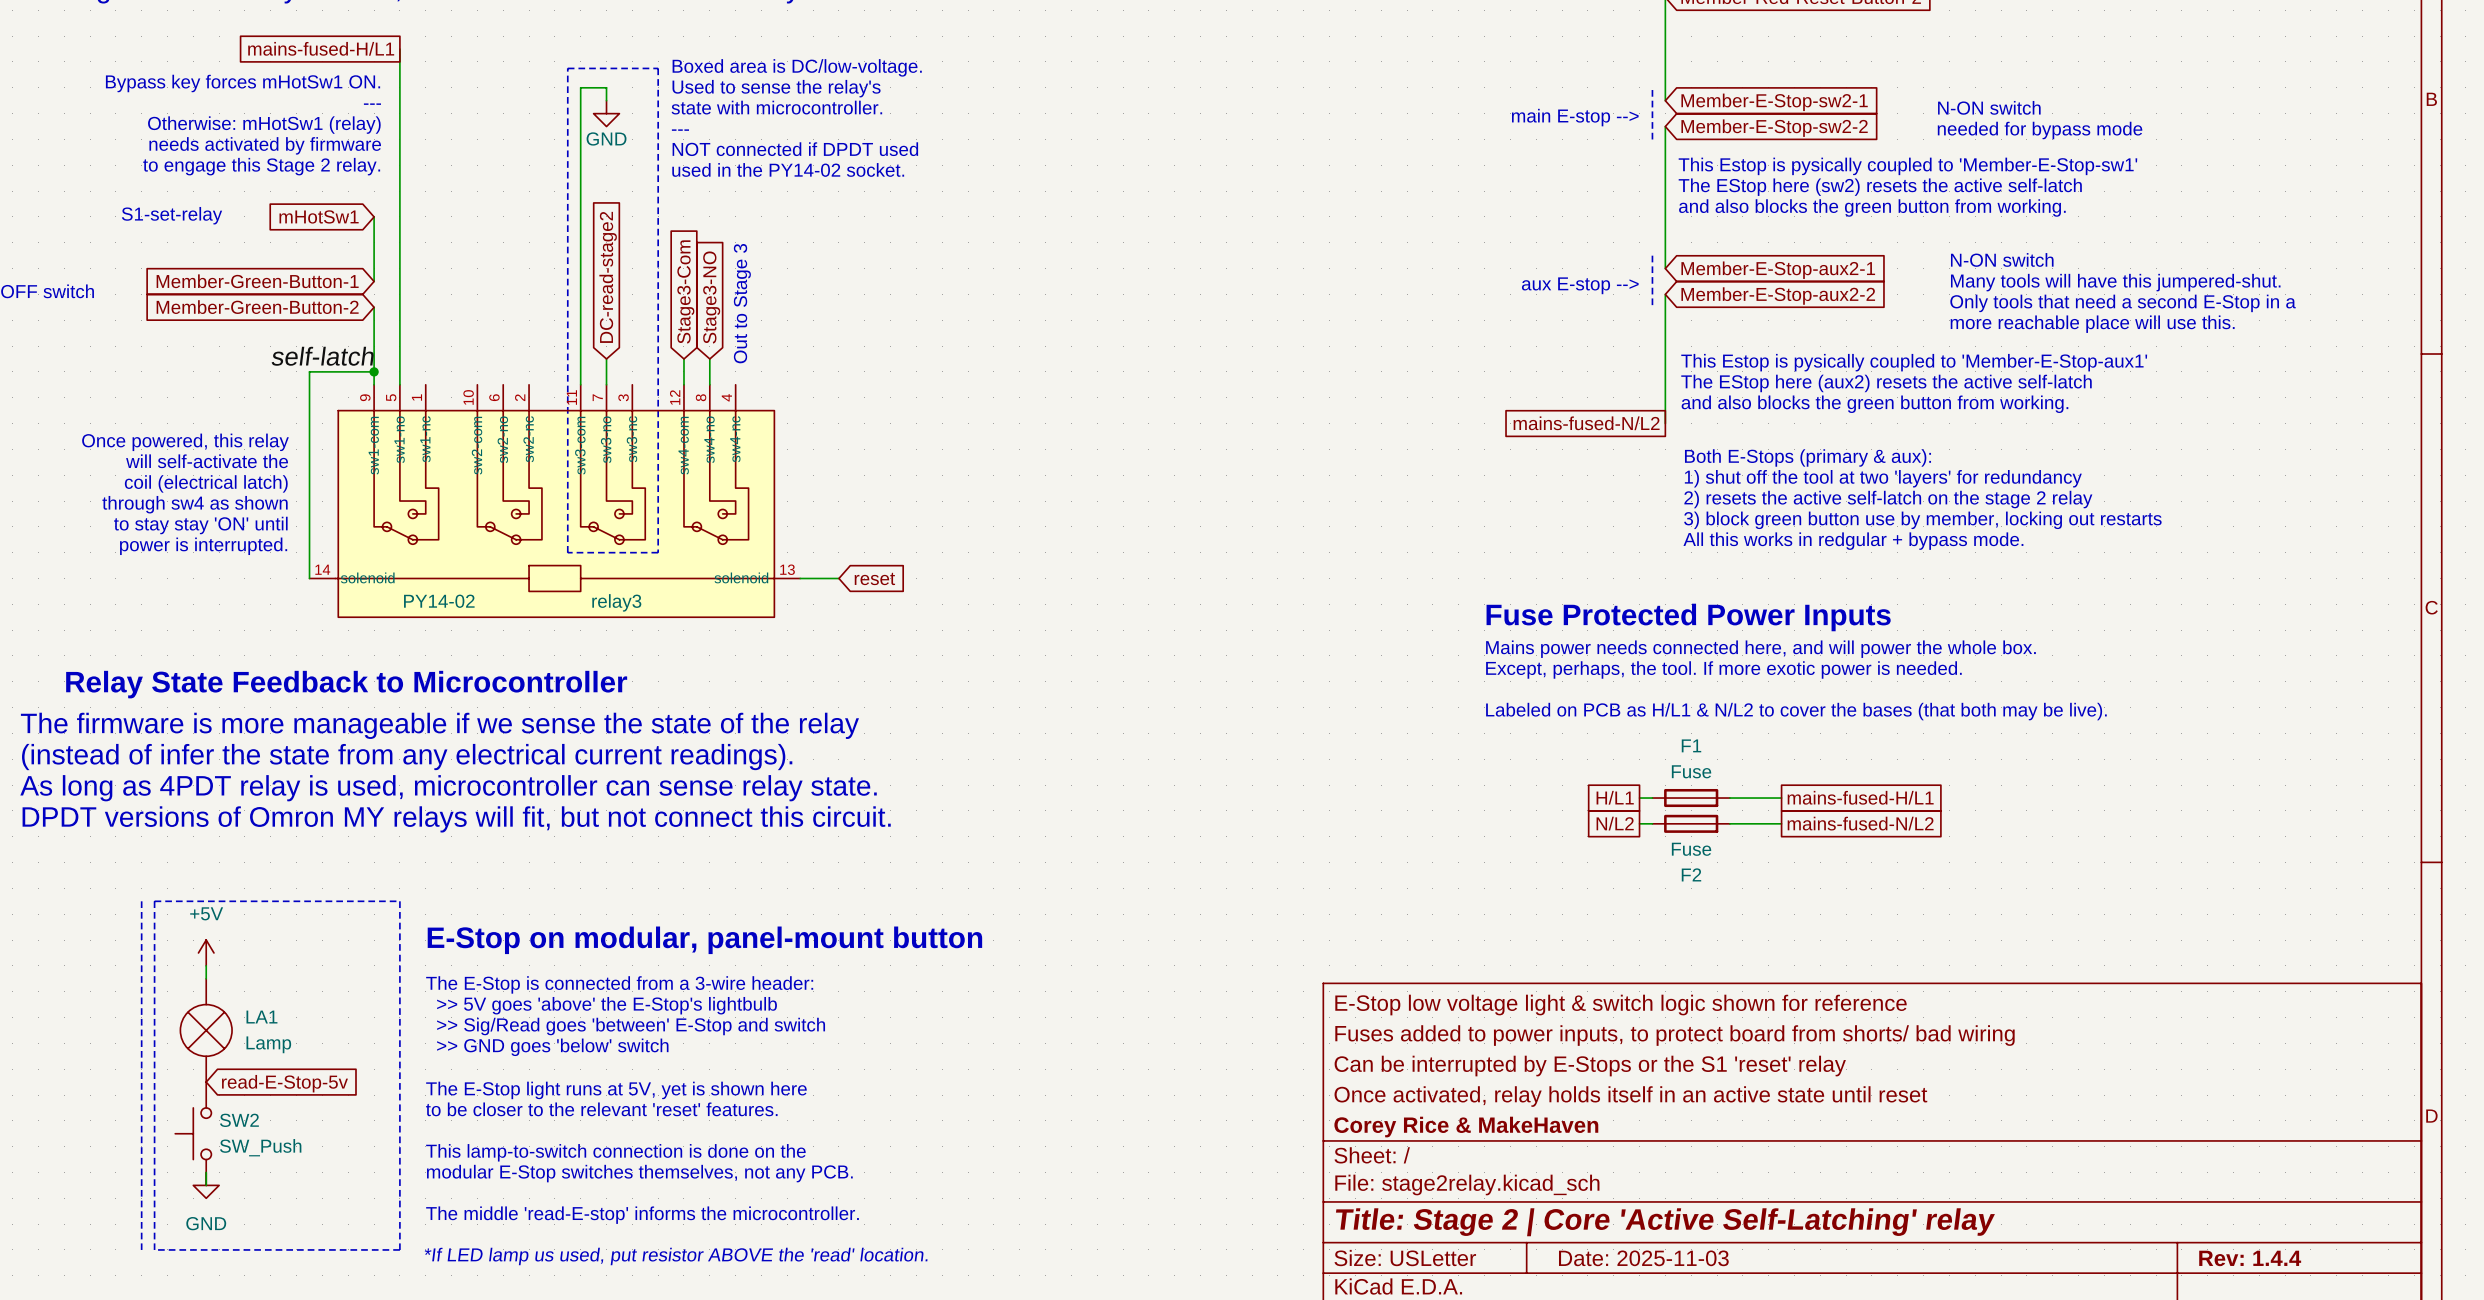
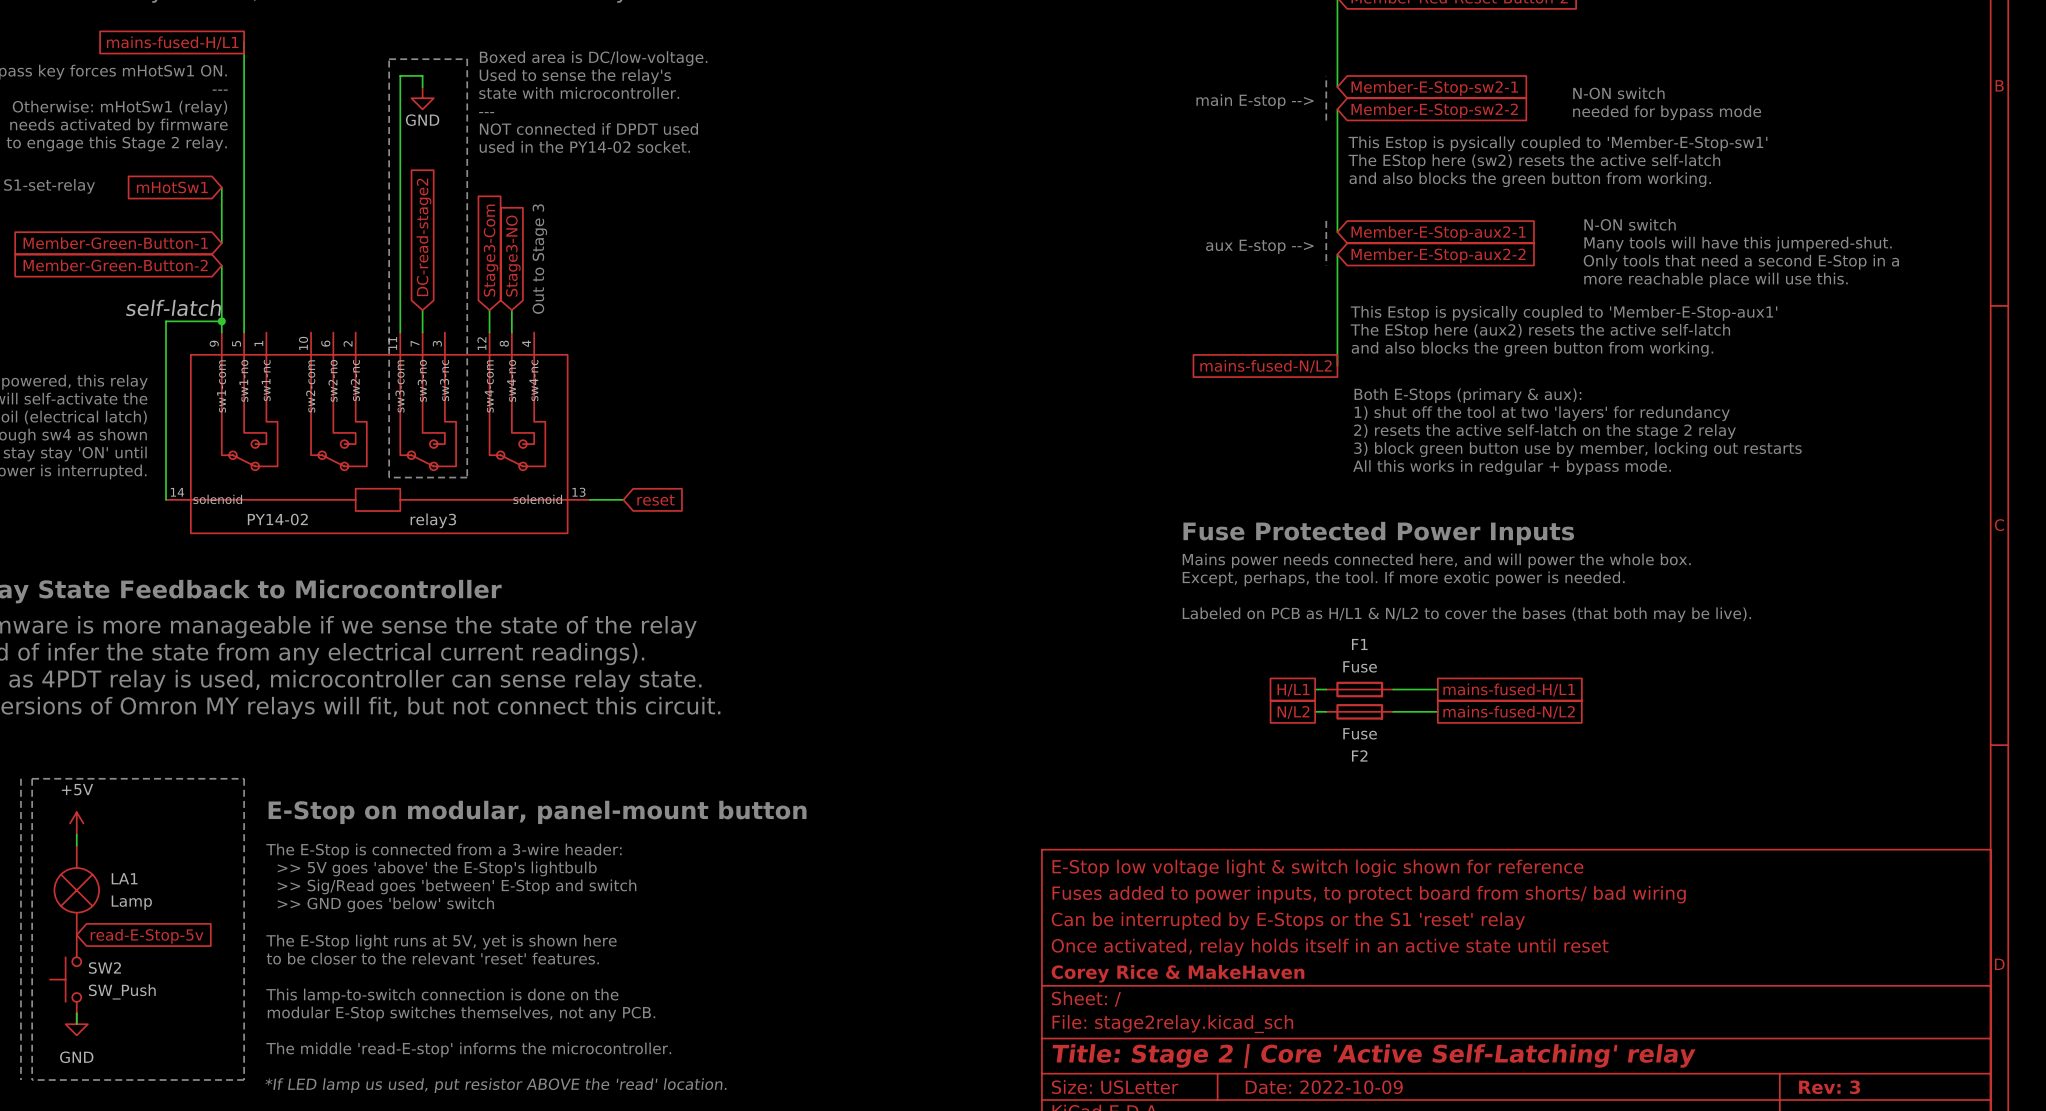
title block: Date: 2025-11-03 (1643, 1258) -> Date: 2022-10-09 (1324, 1087)
title block: Rev: 1.4.4 (2250, 1258) -> Rev: 3 (1829, 1087)

